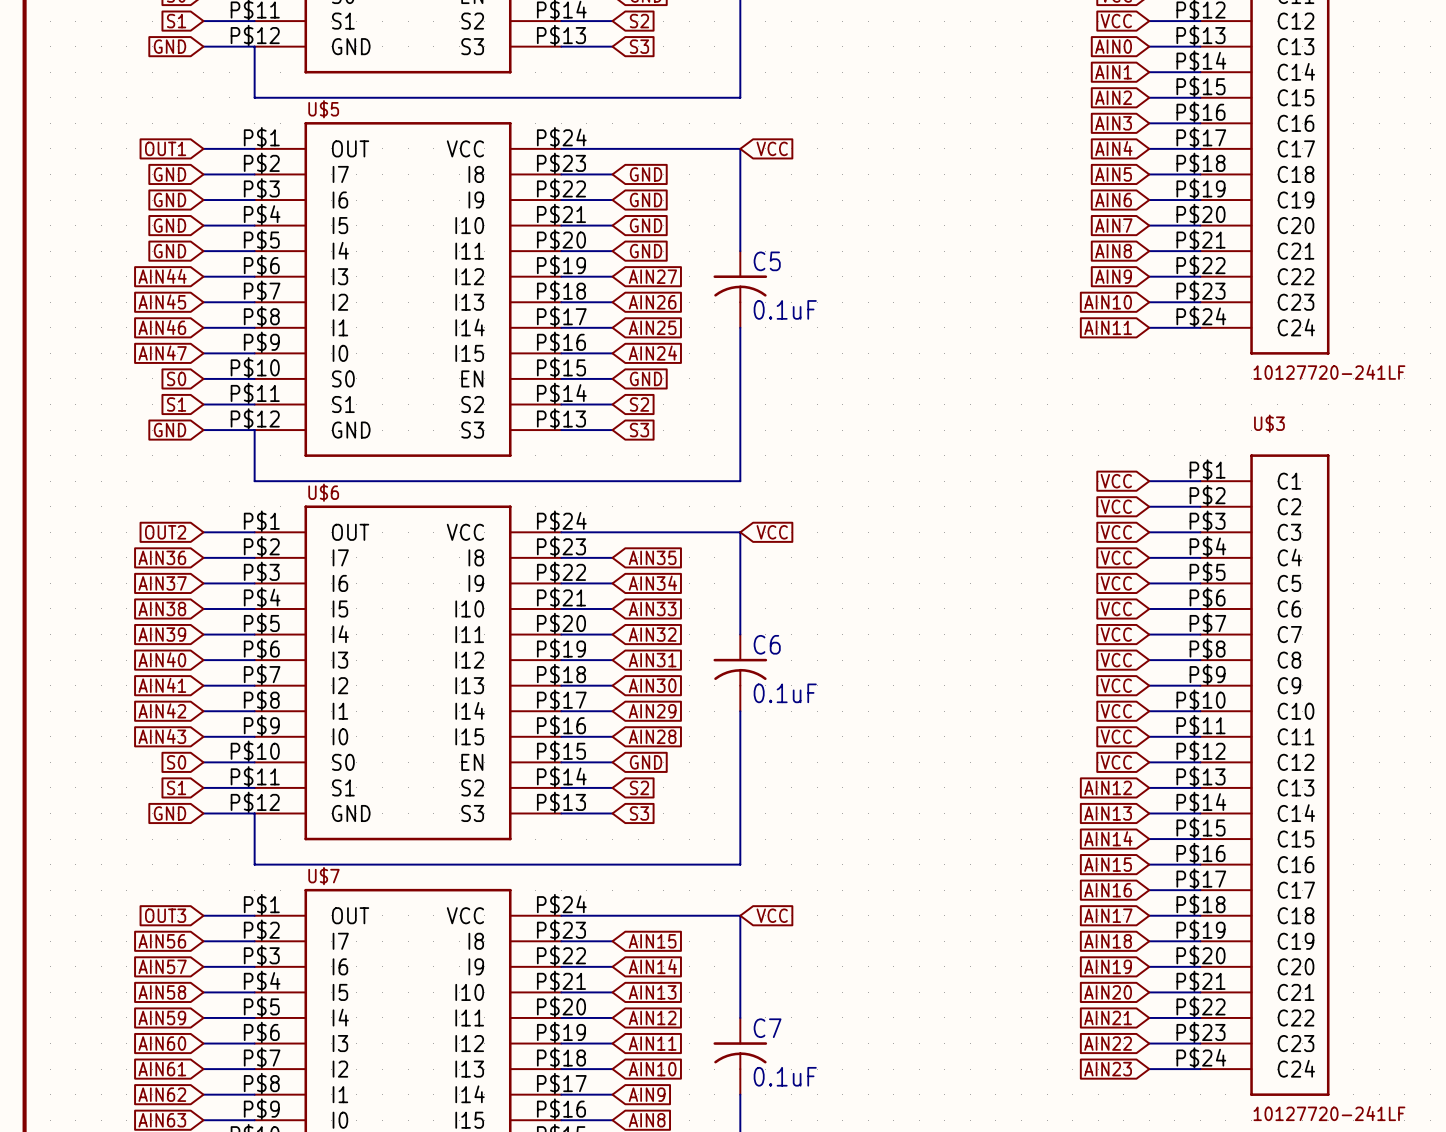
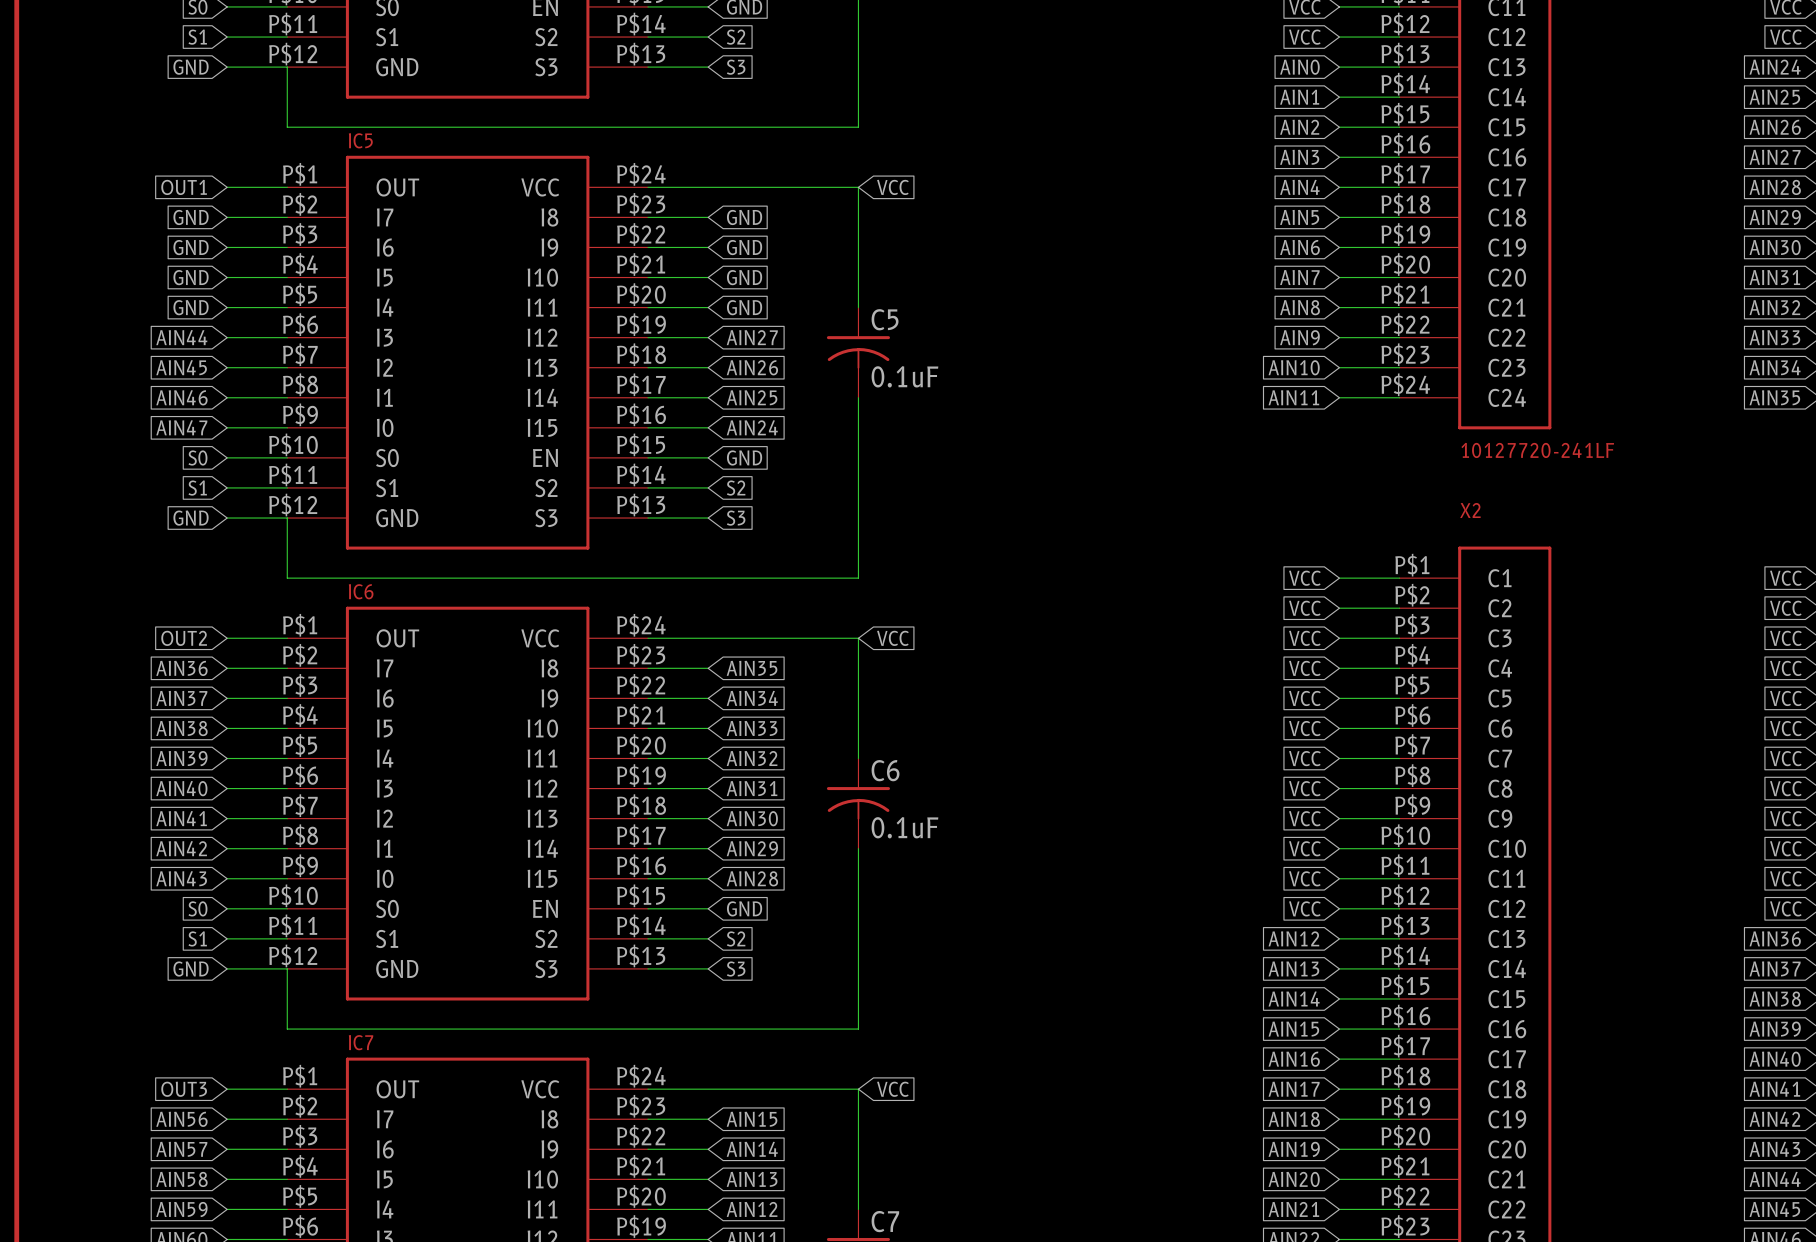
U$5 name: U$5 (323, 109) -> IC5 (360, 140)
U$3 name: U$3 (1269, 423) -> X2 (1470, 510)
U$6 name: U$6 (323, 492) -> IC6 (361, 591)
U$7 name: U$7 (323, 876) -> IC7 (361, 1042)

